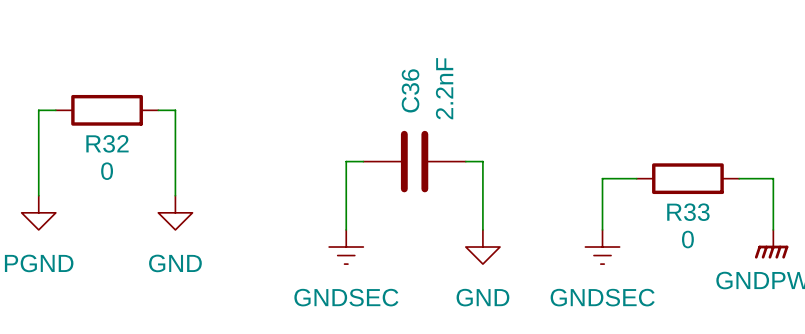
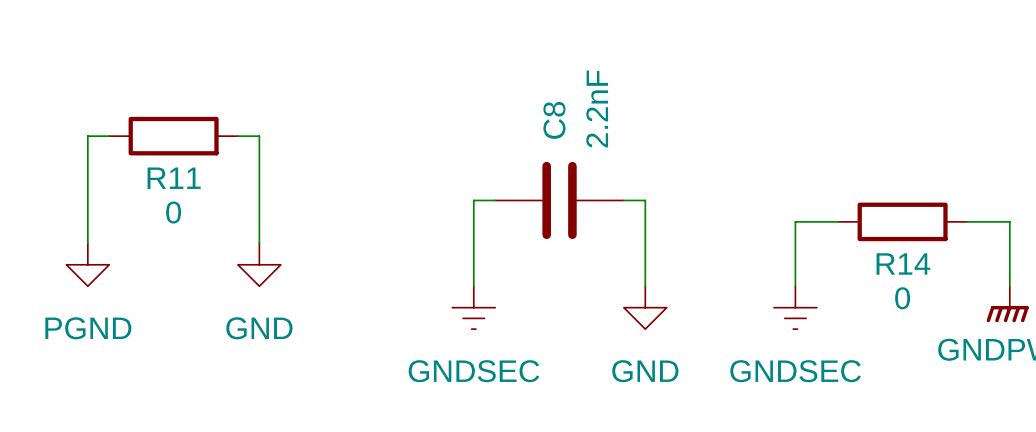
C36 name: C36 (410, 90) -> C8 (554, 120)
R32 name: R32 (107, 143) -> R11 (174, 178)
R33 name: R33 (688, 212) -> R14 (903, 263)

